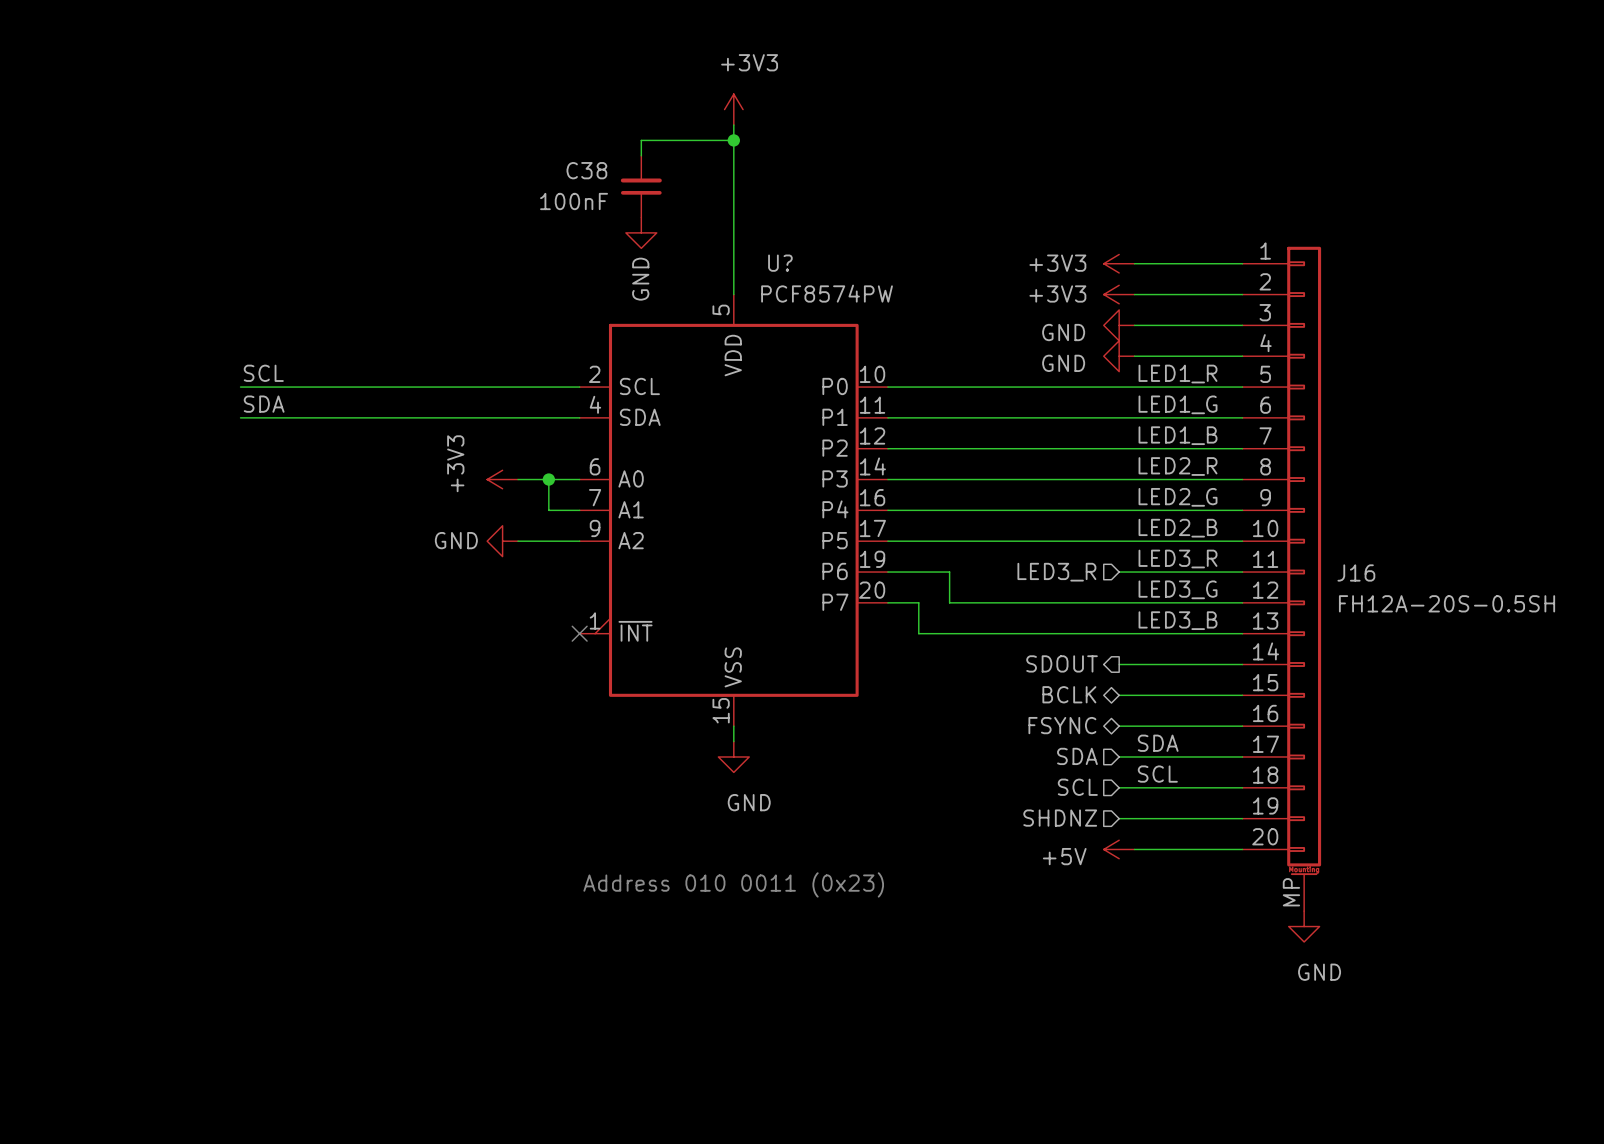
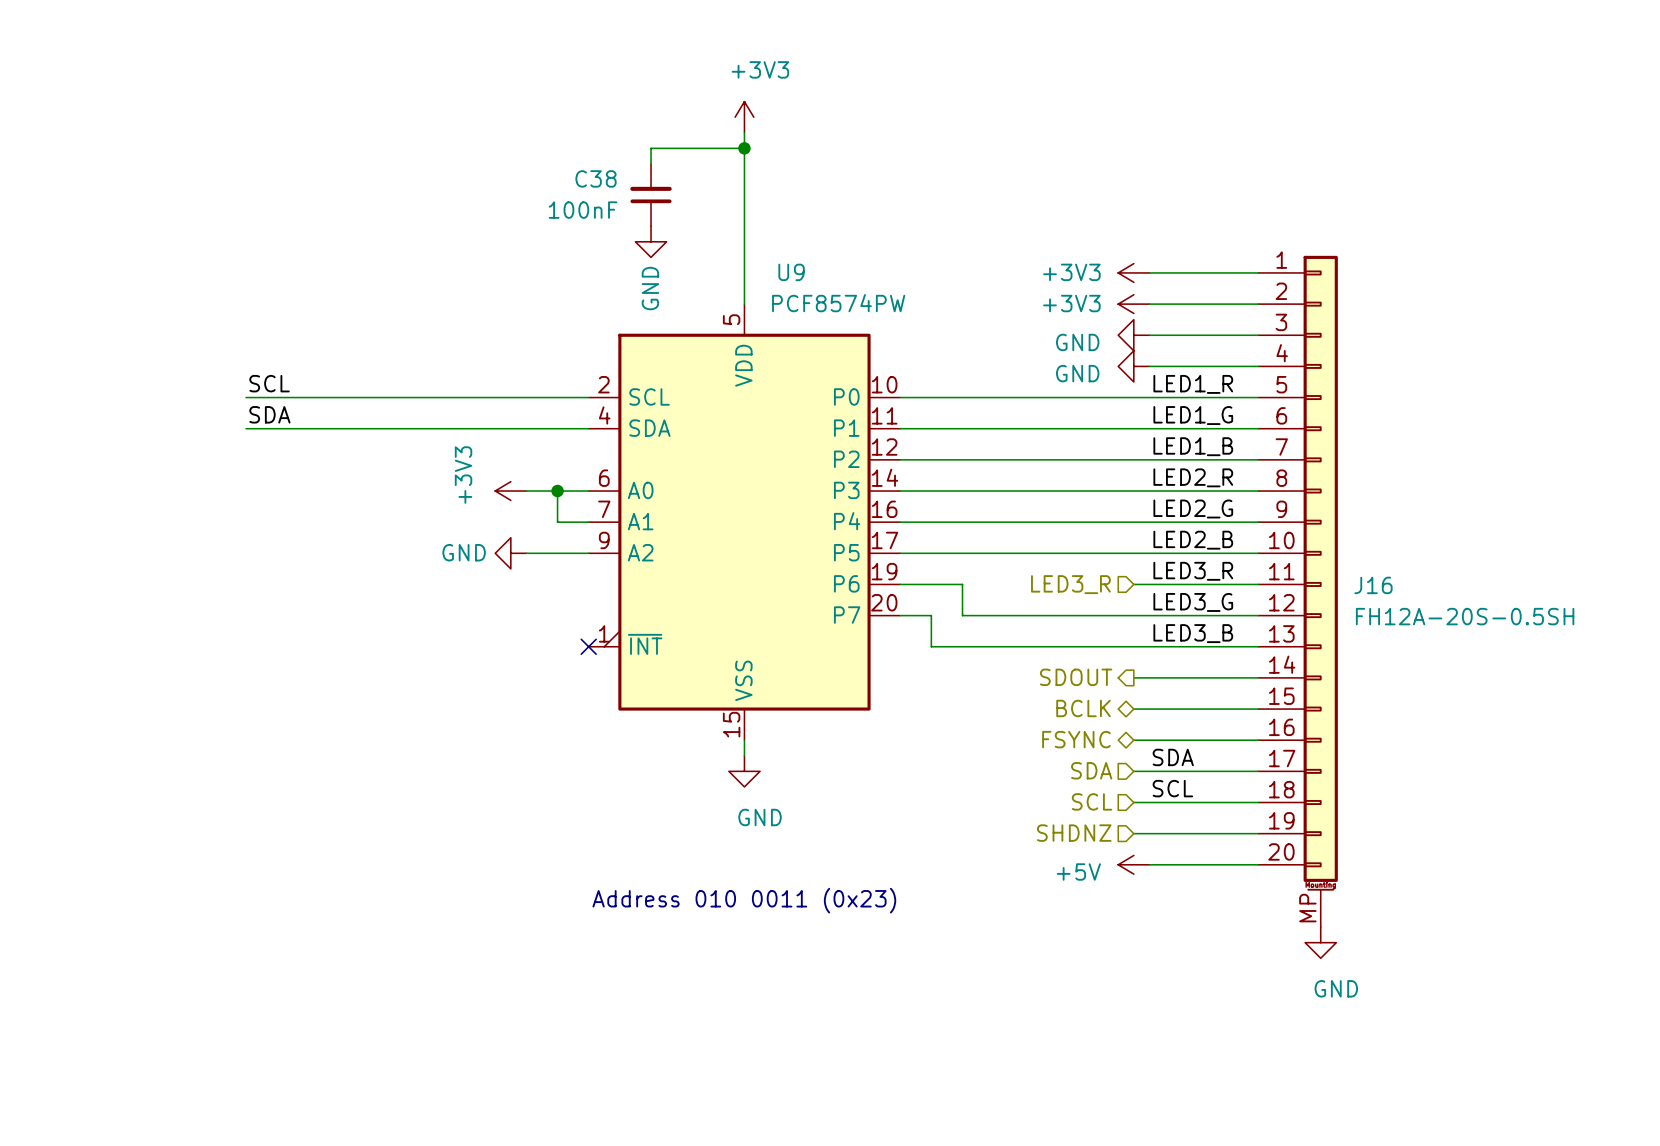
U? name: U? (780, 263) -> U9 (791, 272)

